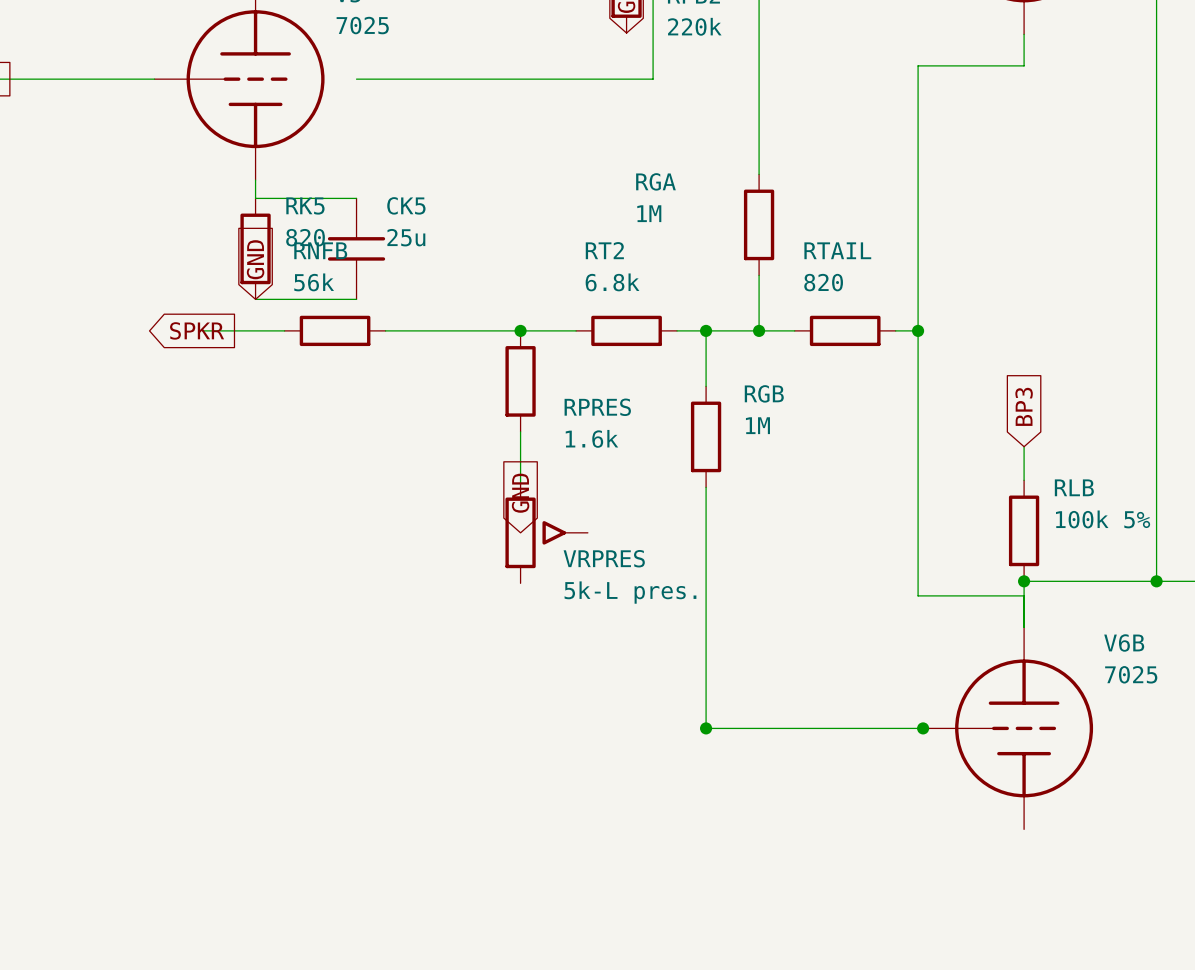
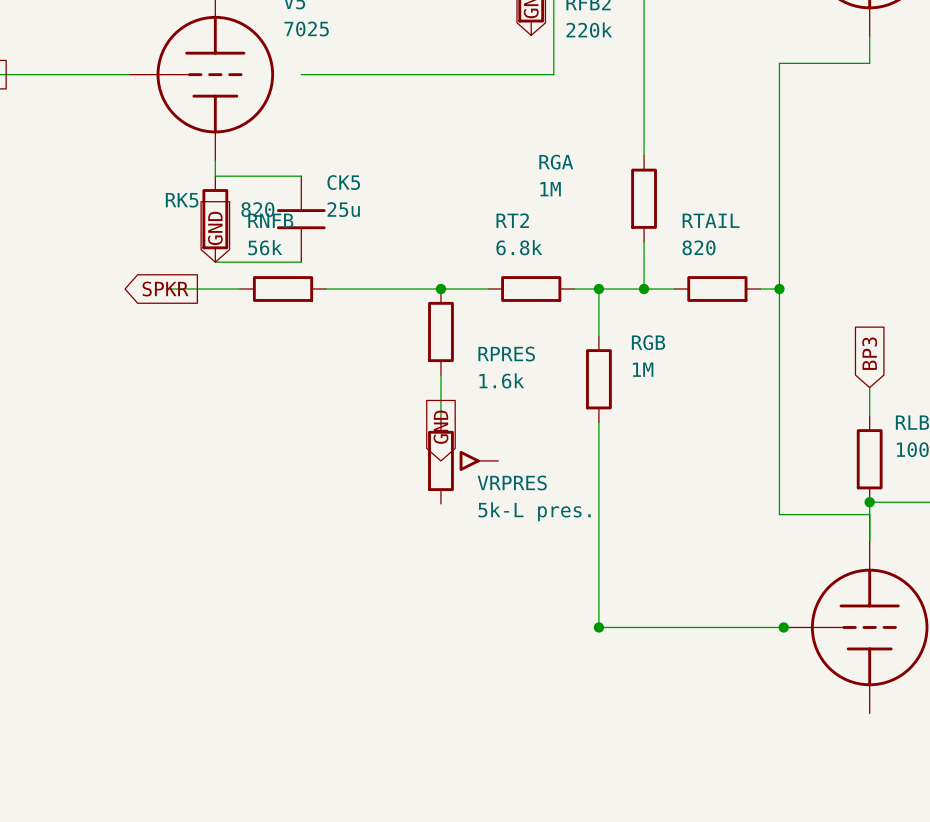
RK5 name position: RK5 (305, 206) -> RK5 (182, 200)

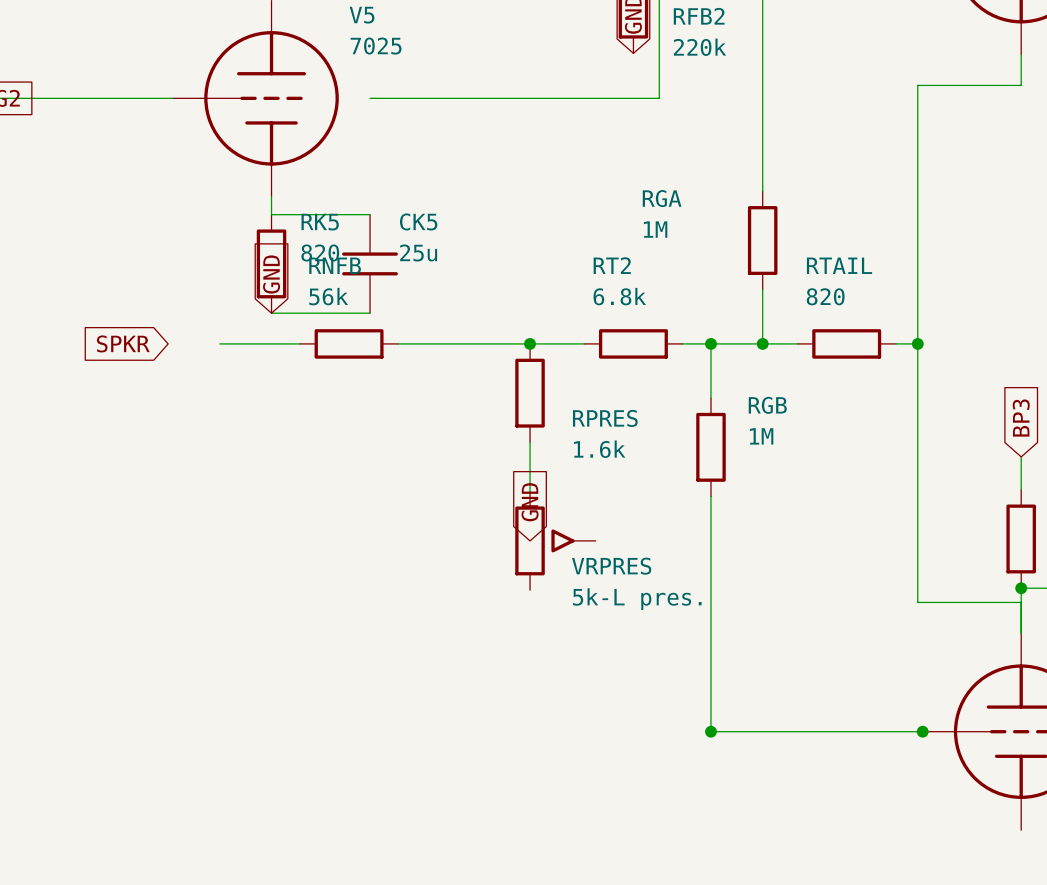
RK5 name position: RK5 (182, 200) -> RK5 (320, 222)
global label rotation: 0° (165, 289) -> 180° (123, 343)

